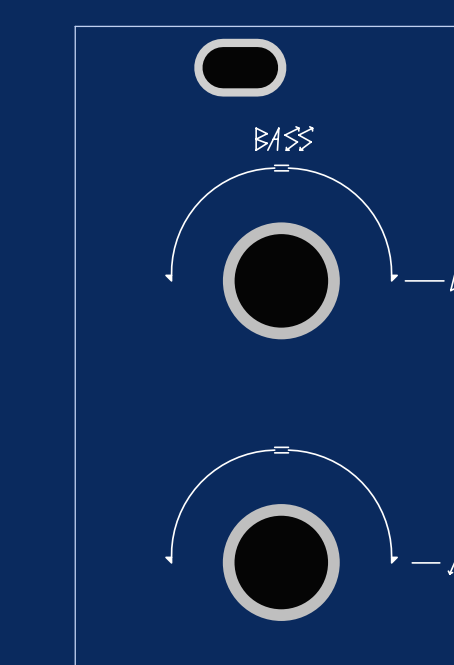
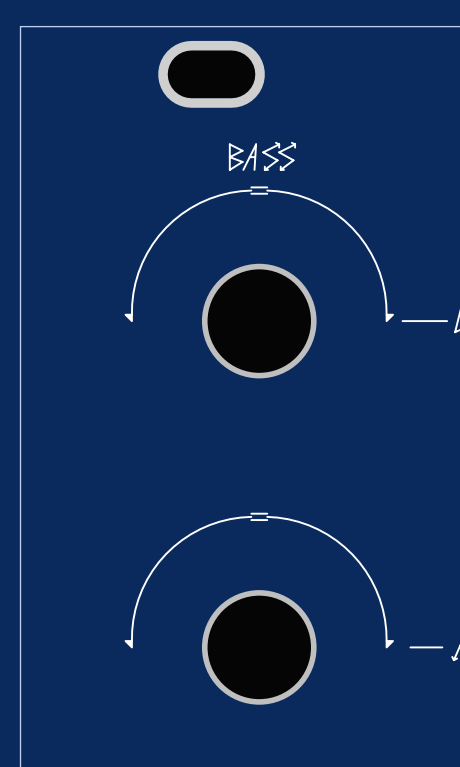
via size: [222, 222, 340, 340] -> [201, 263, 317, 379]
via size: [222, 504, 340, 621] -> [201, 590, 317, 705]

